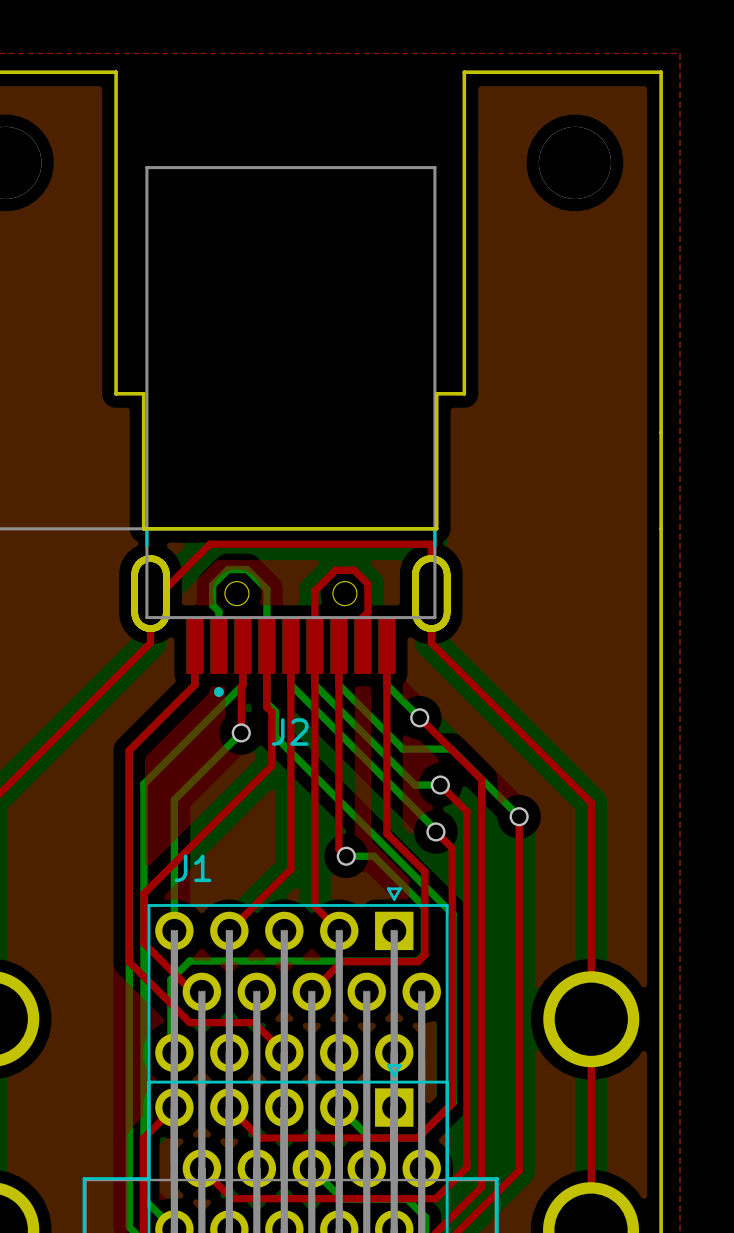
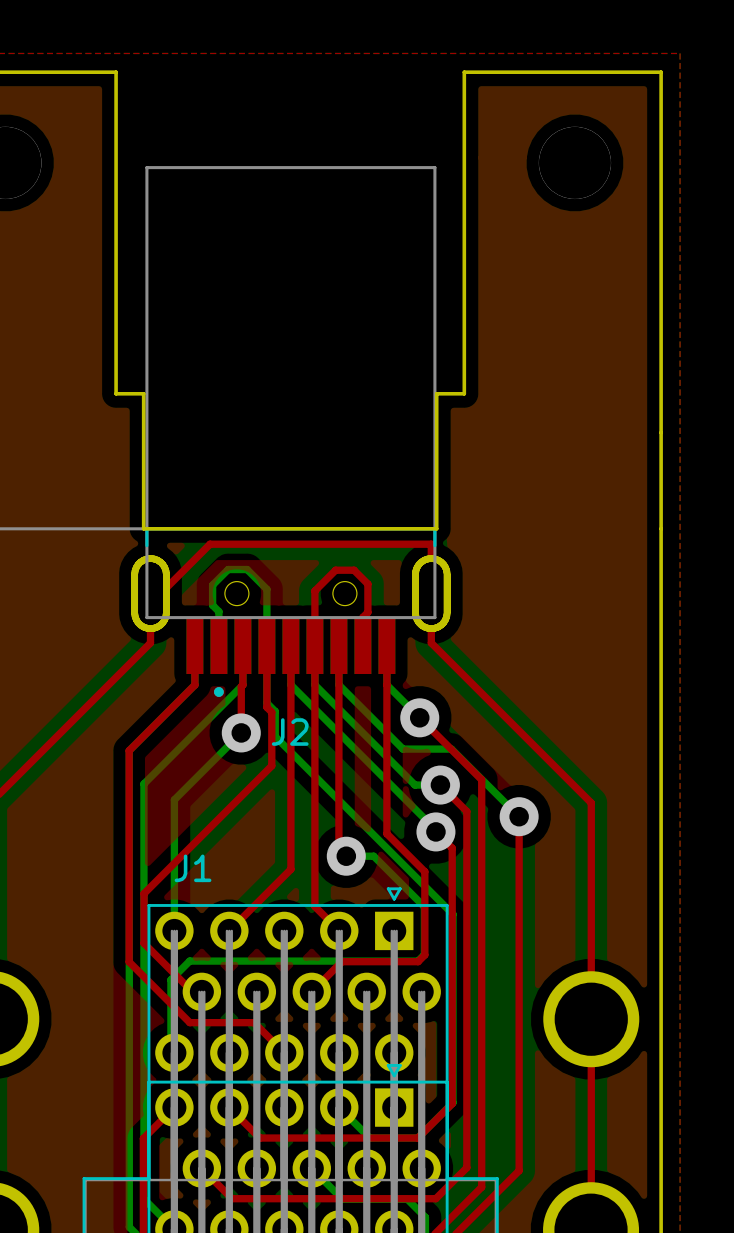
via size: [410, 708, 430, 728] -> [400, 698, 440, 738]
via size: [231, 723, 251, 743] -> [221, 713, 261, 753]
via size: [430, 775, 451, 795] -> [420, 765, 460, 805]
via size: [509, 807, 529, 827] -> [499, 797, 539, 837]
via size: [426, 822, 446, 842] -> [416, 812, 456, 852]
via size: [336, 846, 356, 866] -> [326, 836, 366, 876]

